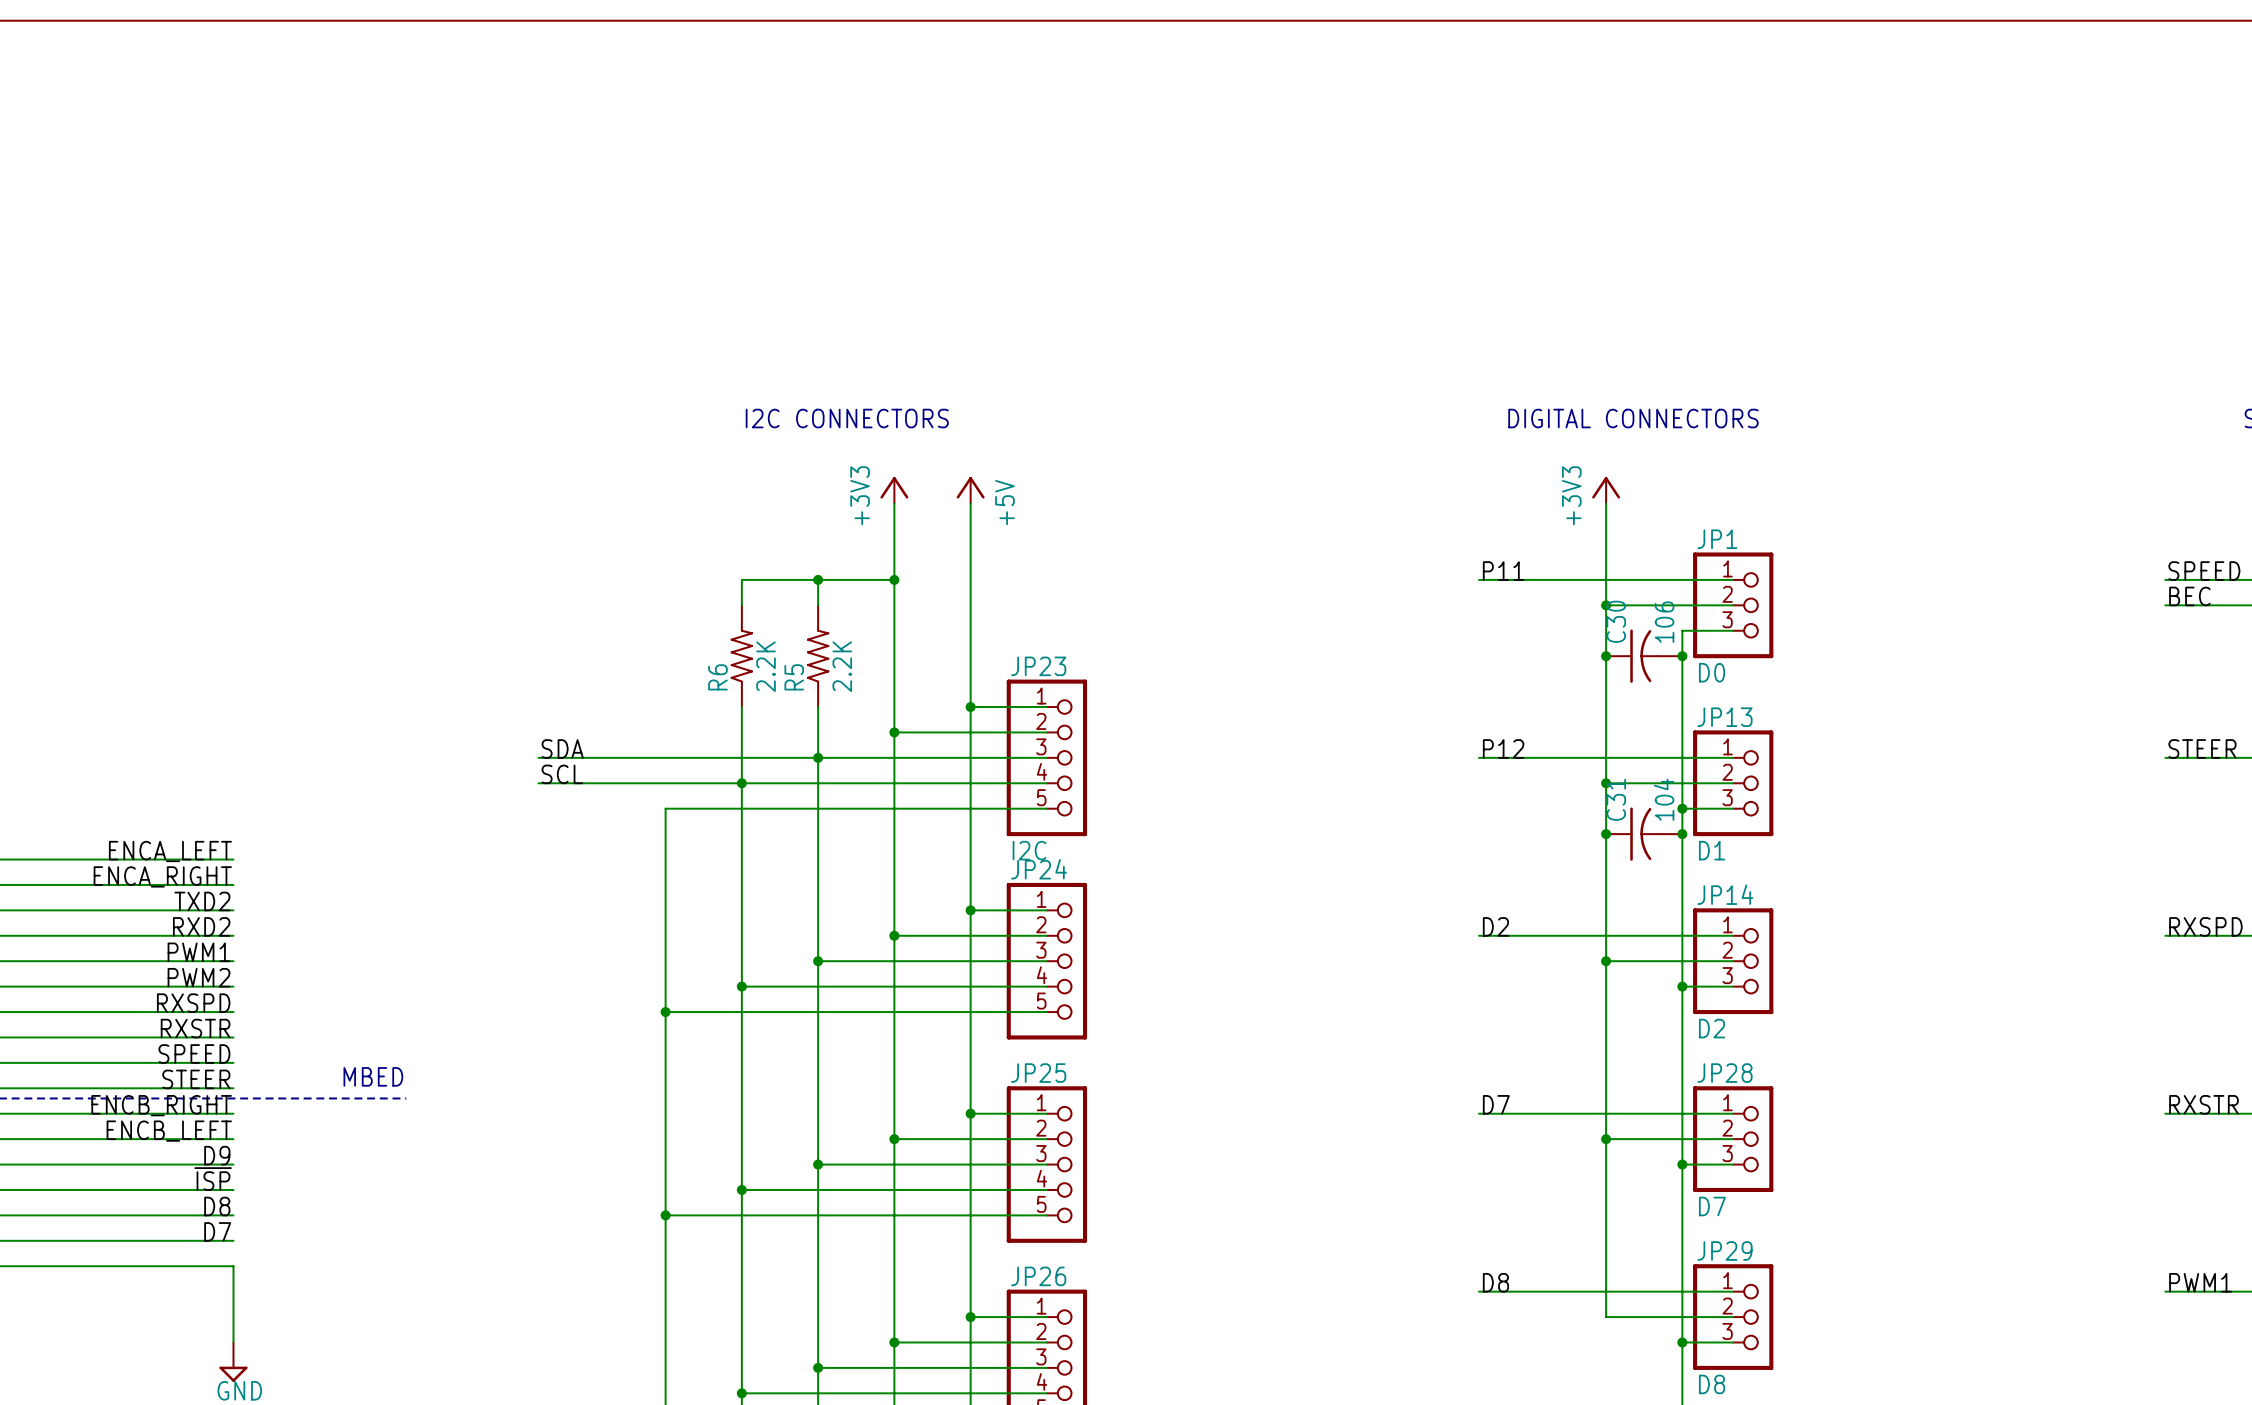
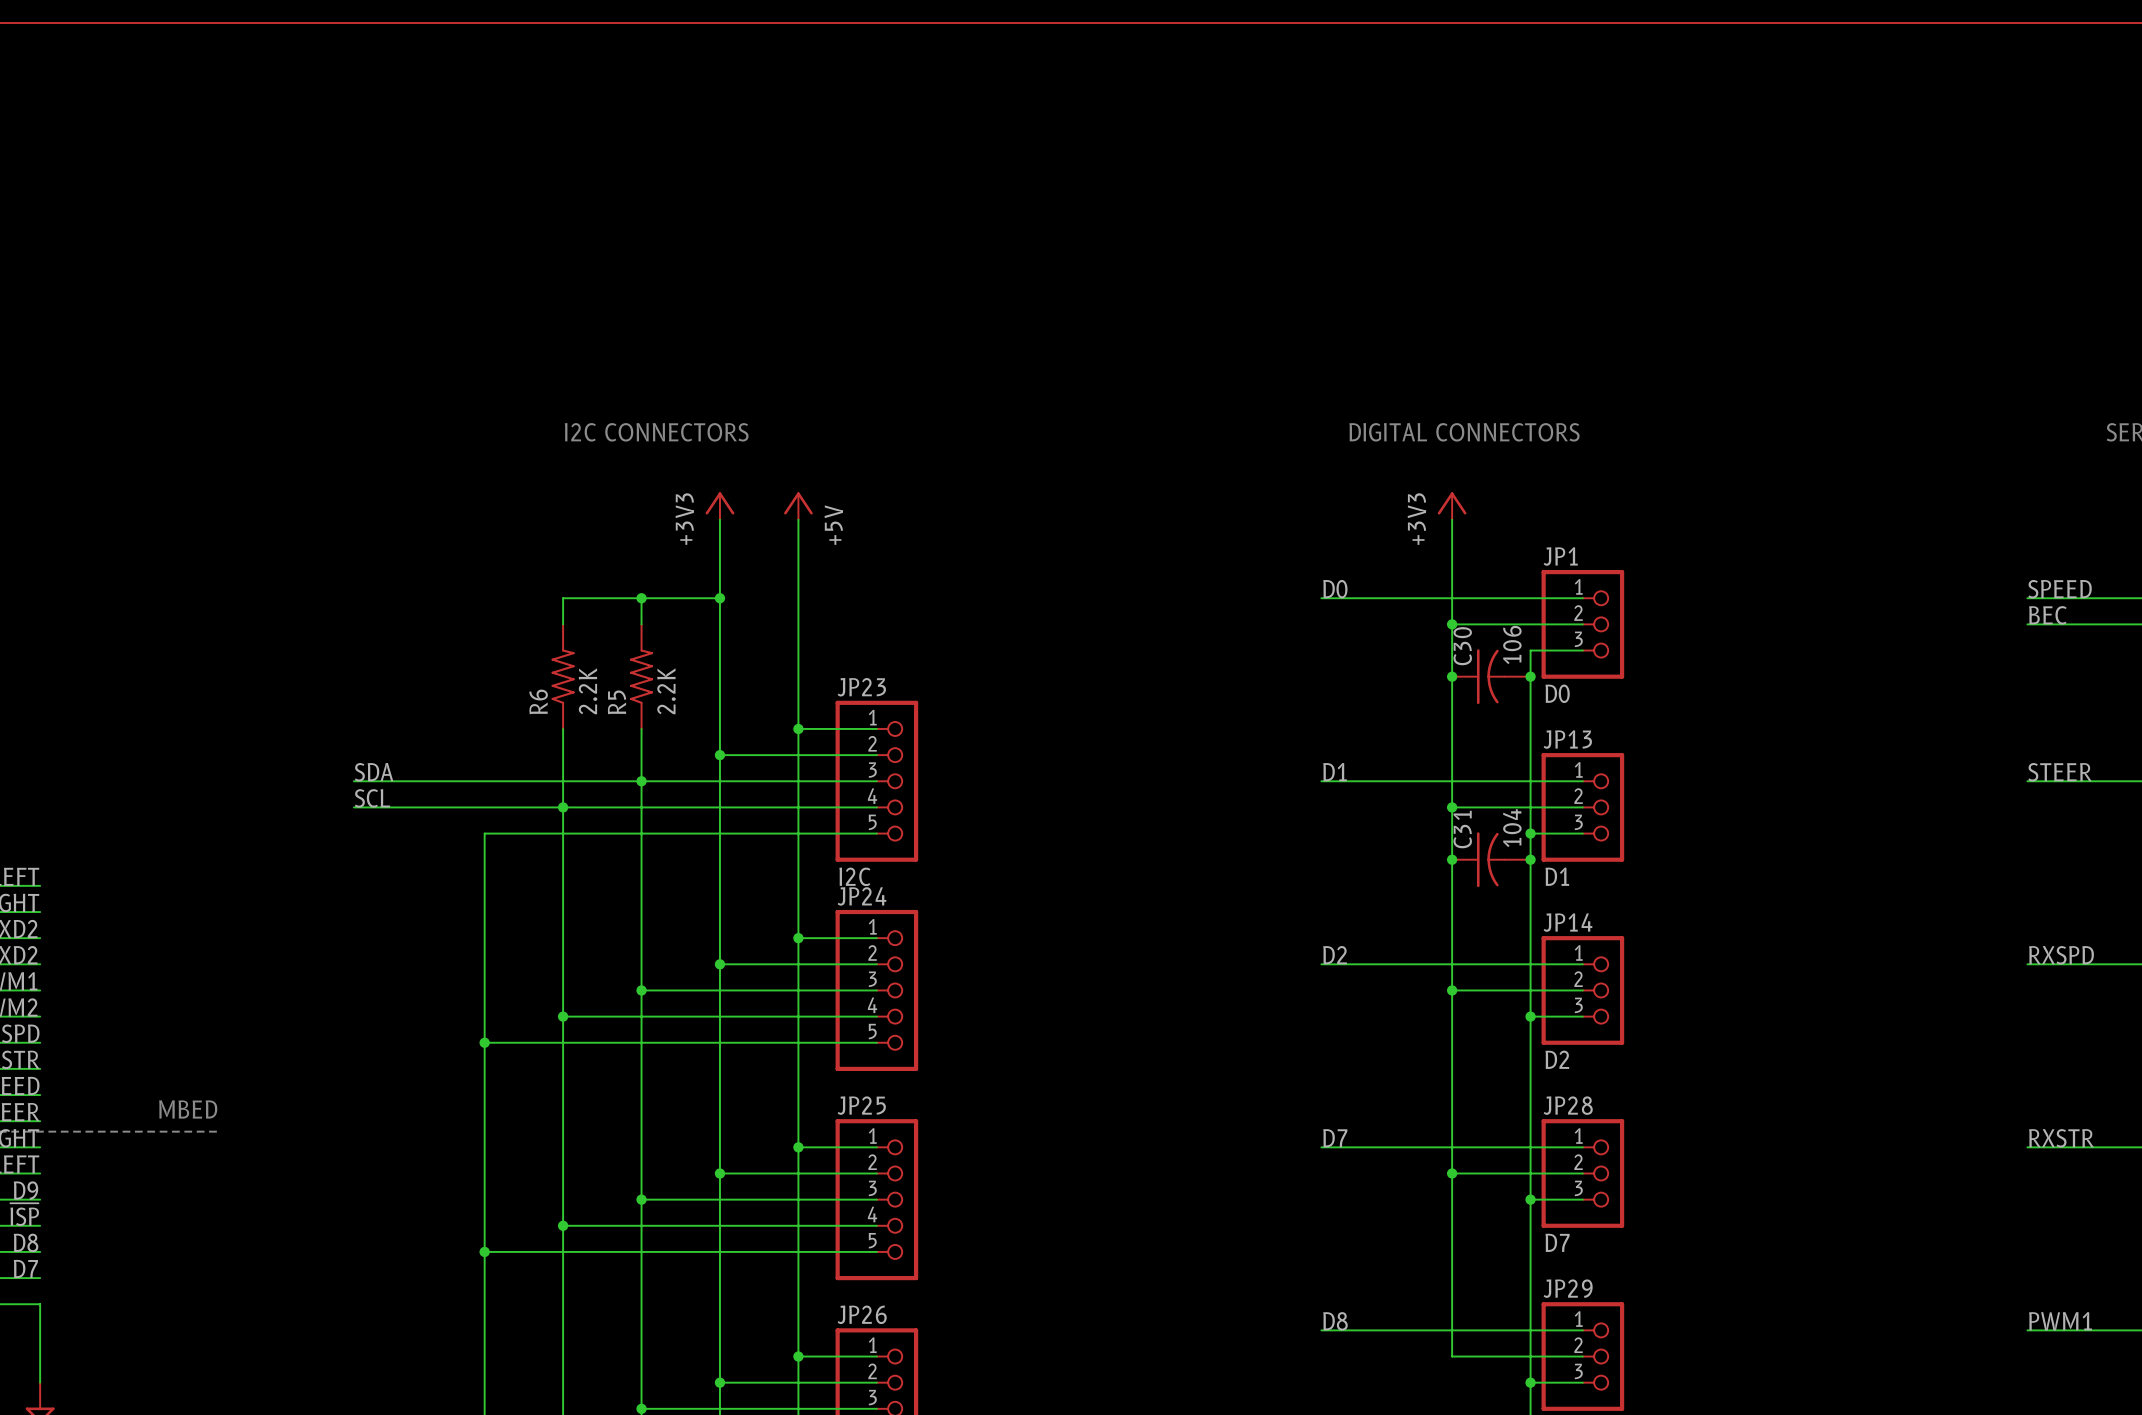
label: P11 (1503, 571) -> D0 (1335, 589)
label: P12 (1503, 748) -> D1 (1335, 772)

